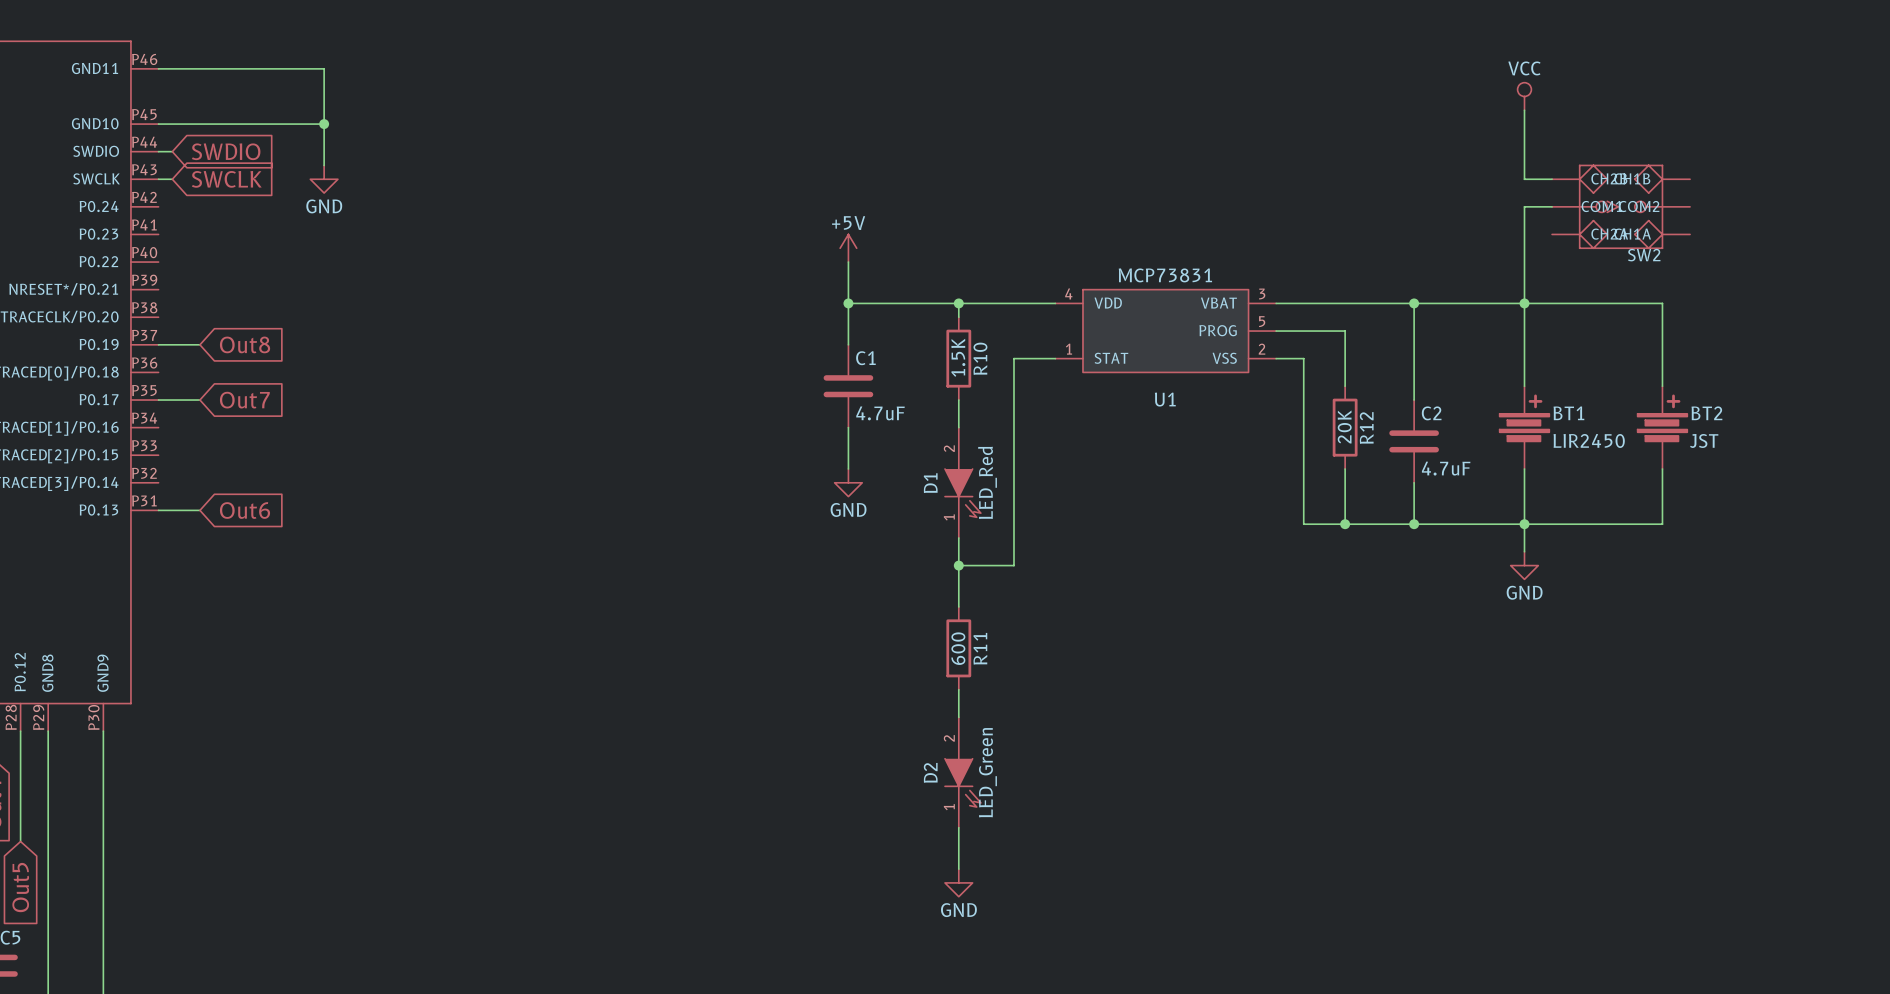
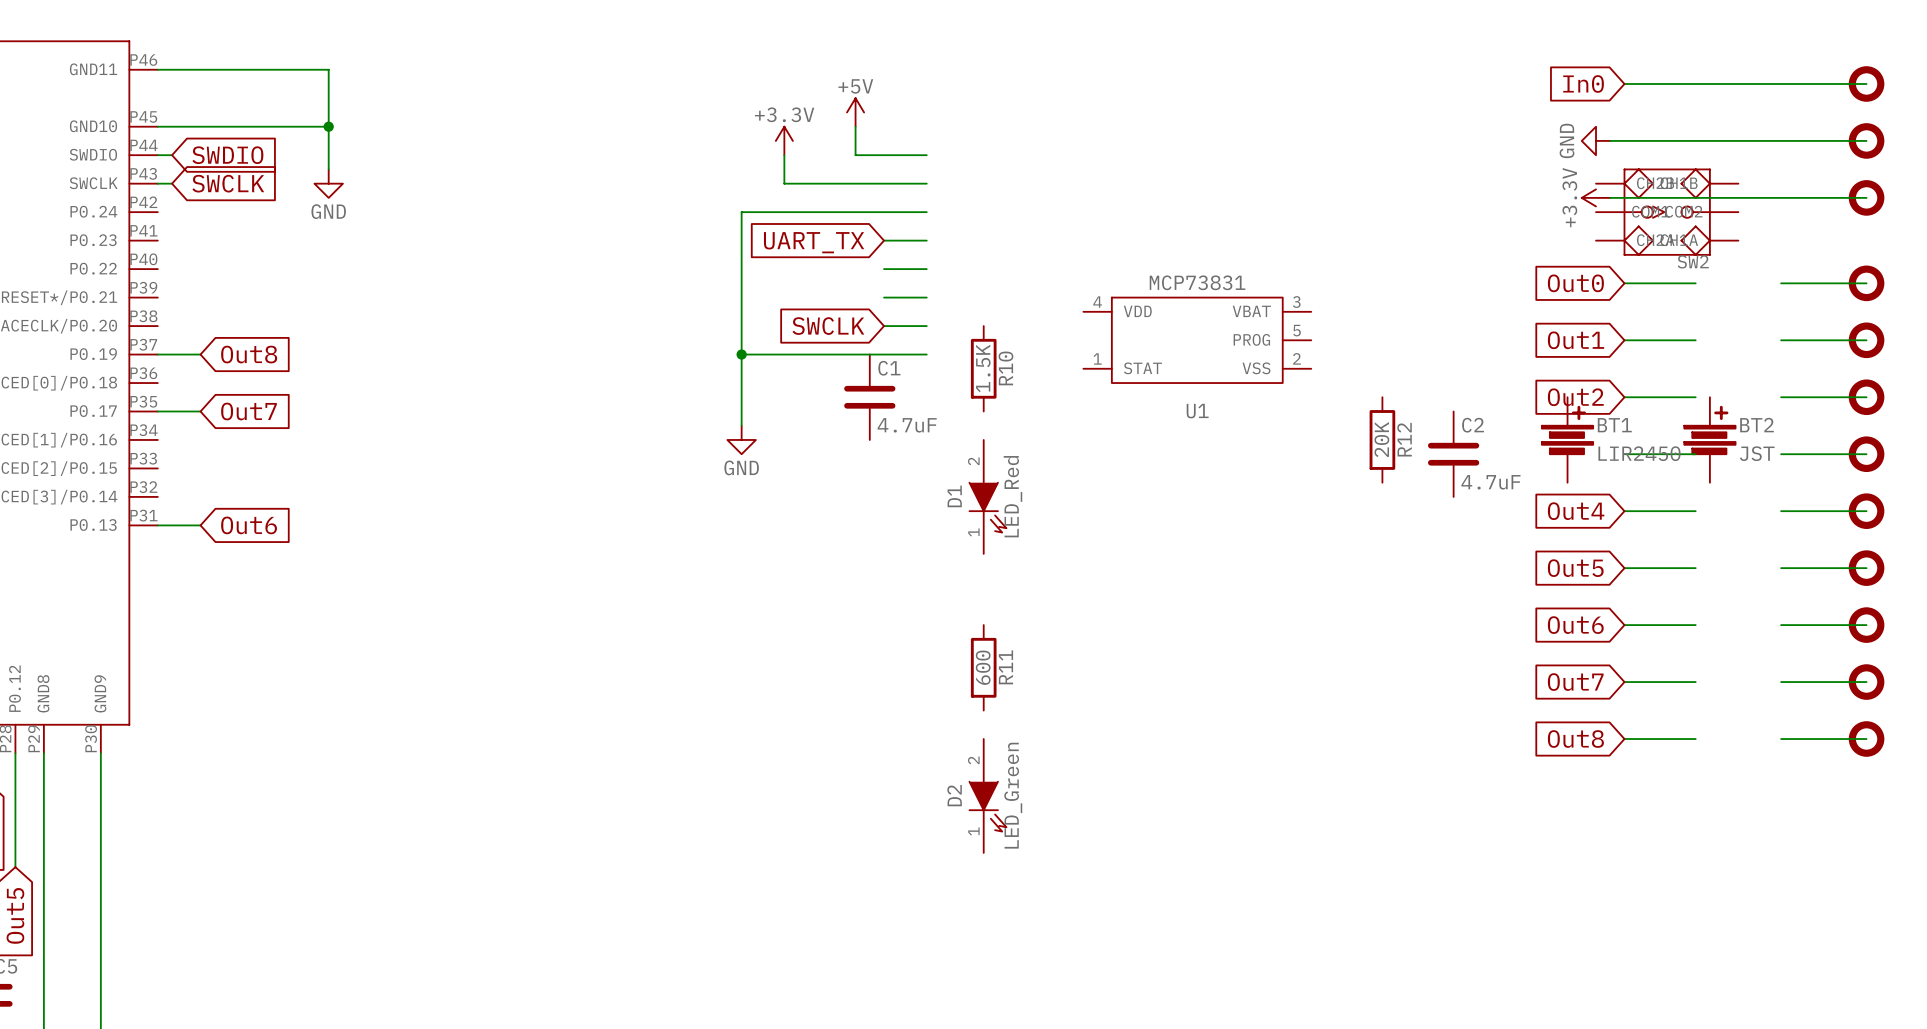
global label: none -> In0 (1583, 83)
wire: none -> (1624, 83) (1866, 83)
part: none -> (1866, 83)
power symbol: VCC (1524, 96) -> none
wire: (1524, 110) (1524, 179) (1552, 179) -> none
wire: none -> (855, 126) (855, 155) (926, 155)
power symbol: none -> +3.3V (784, 140)
power symbol: none -> GND (1596, 140)
wire: none -> (1610, 140) (1866, 140)
part: none -> (1866, 140)
wire: none -> (784, 155) (784, 183) (926, 183)
power symbol: none -> +3.3V (1596, 197)
wire: none -> (1610, 197) (1866, 197)
part: none -> (1866, 197)
wire: none -> (926, 212) (741, 212) (741, 425)
wire: (1552, 206) (1524, 206) (1524, 386) -> none
wire: none -> (884, 240) (926, 240)
global label: none -> UART_TX (814, 242)
power symbol position: +5V (848, 248) -> +5V (855, 112)
wire: (848, 262) (848, 344) -> none
wire: none -> (884, 269) (926, 269)
global label: none -> Out0 (1575, 283)
wire: none -> (1624, 283) (1695, 283)
wire: none -> (1781, 283) (1866, 283)
part: none -> (1866, 283)
wire: none -> (884, 297) (926, 297)
wire: (848, 303) (1055, 303) -> none
junction: (848, 303) -> none
wire: (958, 303) (958, 317) -> none
junction: (958, 303) -> none
wire: (1276, 303) (1662, 303) (1662, 386) -> none
wire: (1414, 303) (1414, 400) -> none
junction: (1414, 303) -> none
junction: (1524, 303) -> none
global label: none -> SWCLK (828, 326)
wire: none -> (884, 326) (926, 326)
wire: (1276, 331) (1345, 331) (1345, 386) -> none
global label: none -> Out1 (1575, 340)
wire: none -> (1624, 340) (1695, 340)
wire: none -> (1781, 340) (1866, 340)
part: none -> (1866, 340)
wire: none -> (741, 354) (926, 354)
junction: none -> (741, 354)
wire: (1055, 358) (1013, 358) (1013, 565) (958, 565) -> none
wire: (1276, 358) (1303, 358) (1303, 524) (1662, 524) (1662, 469) -> none
global label: none -> Out2 (1575, 397)
wire: none -> (1624, 397) (1695, 397)
wire: none -> (1781, 397) (1866, 397)
part: none -> (1866, 397)
wire: (958, 400) (958, 427) -> none
wire: (848, 427) (848, 469) -> none
wire: none -> (1624, 454) (1695, 454)
wire: none -> (1781, 454) (1866, 454)
part: none -> (1866, 454)
wire: (1345, 469) (1345, 524) -> none
wire: (1524, 469) (1524, 551) -> none
power symbol position: GND (848, 482) -> GND (741, 439)
wire: (1414, 482) (1414, 524) -> none
global label: none -> Out4 (1576, 511)
wire: none -> (1624, 511) (1695, 511)
wire: none -> (1781, 511) (1866, 511)
part: none -> (1866, 511)
junction: (1345, 524) -> none
junction: (1414, 524) -> none
junction: (1524, 524) -> none
wire: (958, 537) (958, 606) -> none
global label: none -> Out5 (1575, 568)
wire: none -> (1624, 568) (1695, 568)
wire: none -> (1781, 568) (1866, 568)
part: none -> (1866, 568)
junction: (958, 565) -> none
power symbol: GND (1524, 565) -> none
wire: none -> (1624, 625) (1695, 625)
wire: none -> (1781, 625) (1866, 625)
part: none -> (1866, 625)
global label: none -> Out6 (1575, 625)
global label: none -> Out7 (1575, 682)
wire: none -> (1624, 682) (1695, 682)
wire: none -> (1781, 682) (1866, 682)
part: none -> (1866, 682)
wire: (958, 689) (958, 717) -> none
global label: none -> Out8 (1575, 739)
wire: none -> (1624, 739) (1695, 739)
wire: none -> (1781, 739) (1866, 739)
part: none -> (1866, 739)
wire: (958, 827) (958, 869) -> none
power symbol: GND (958, 882) -> none

